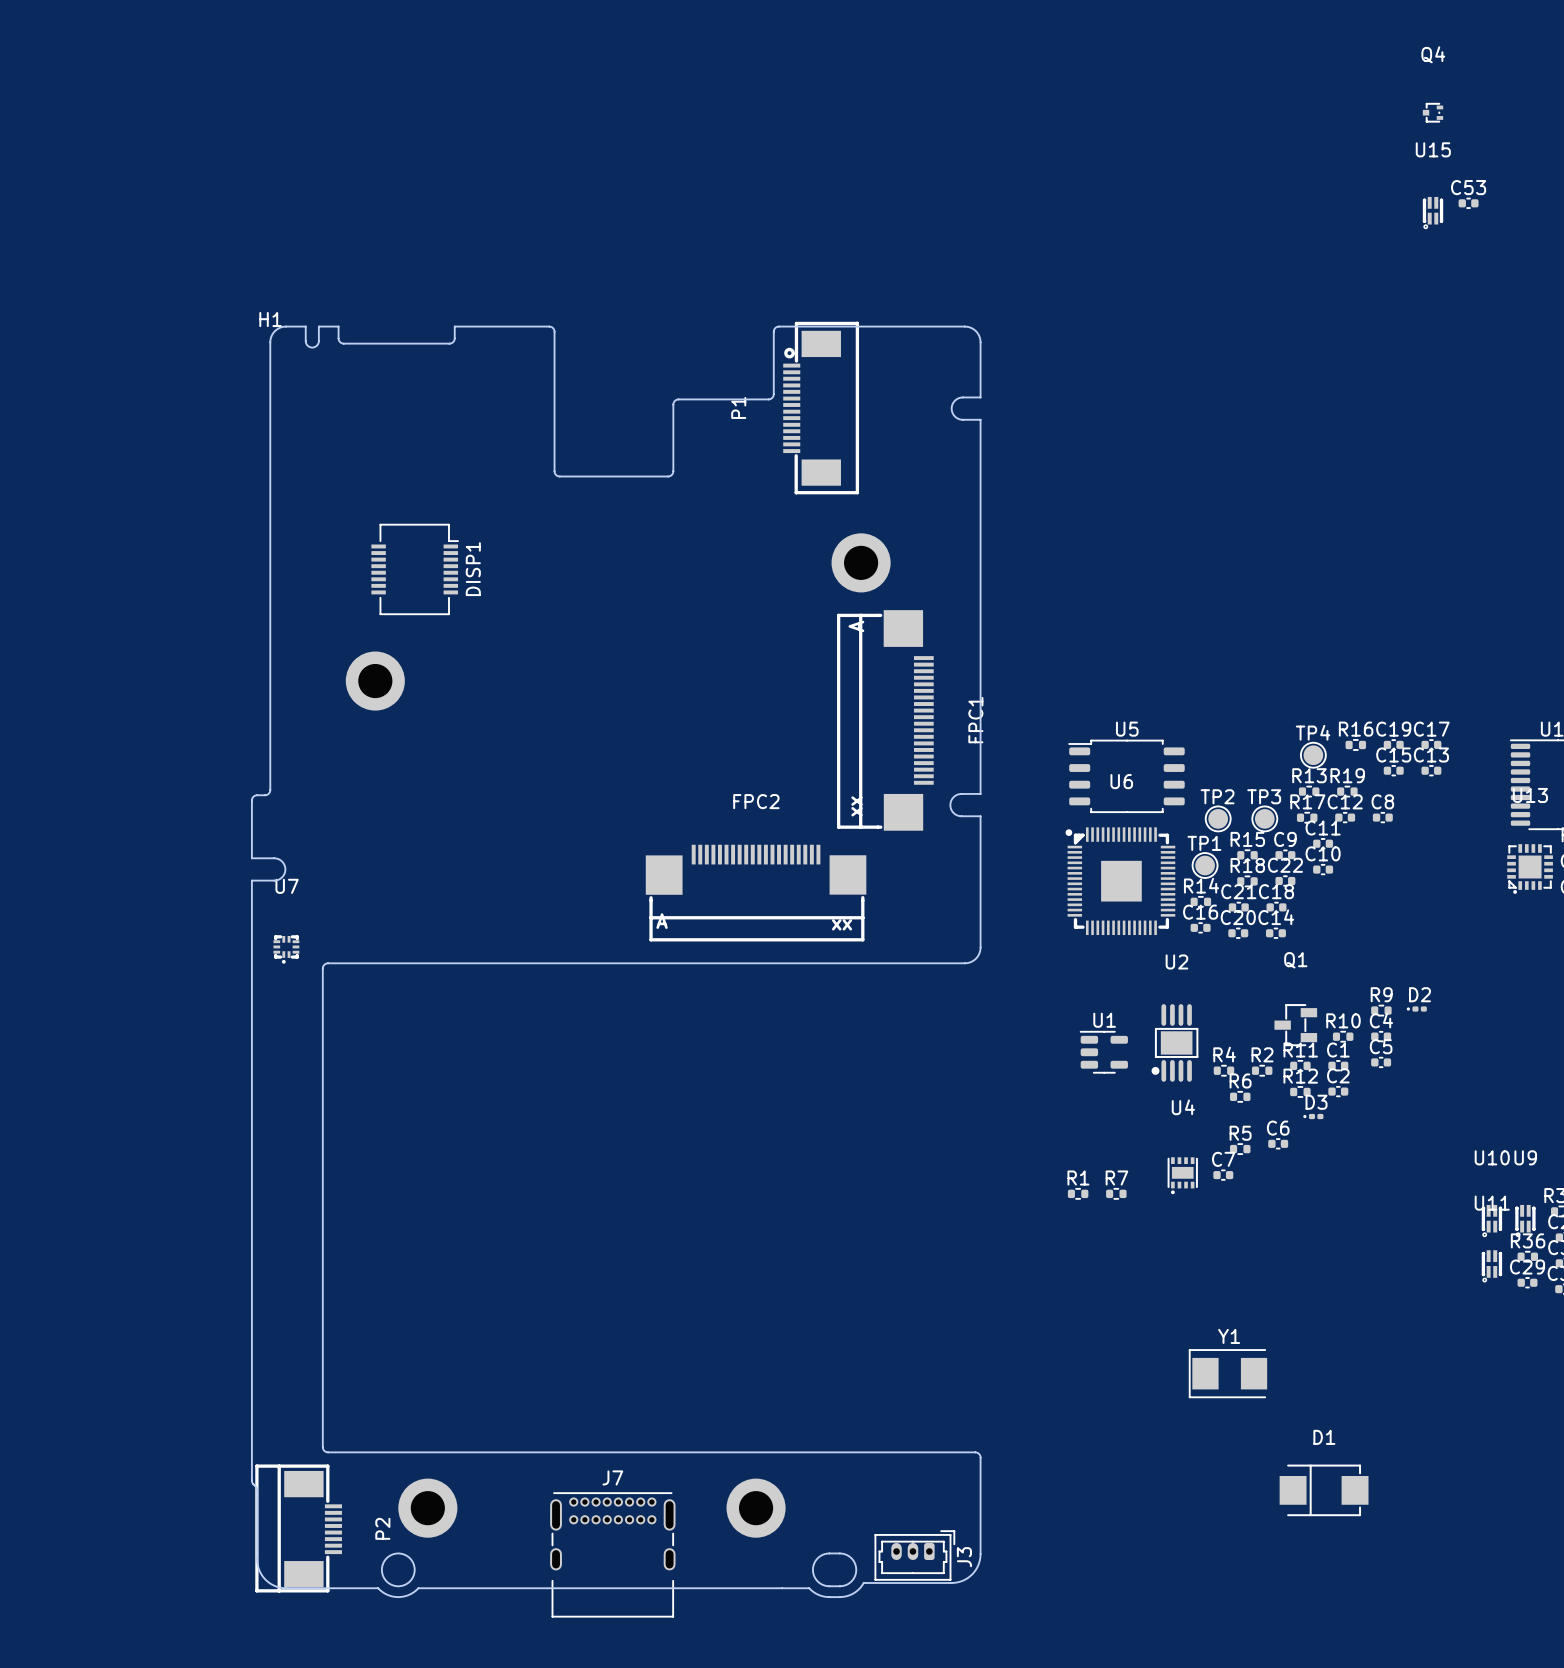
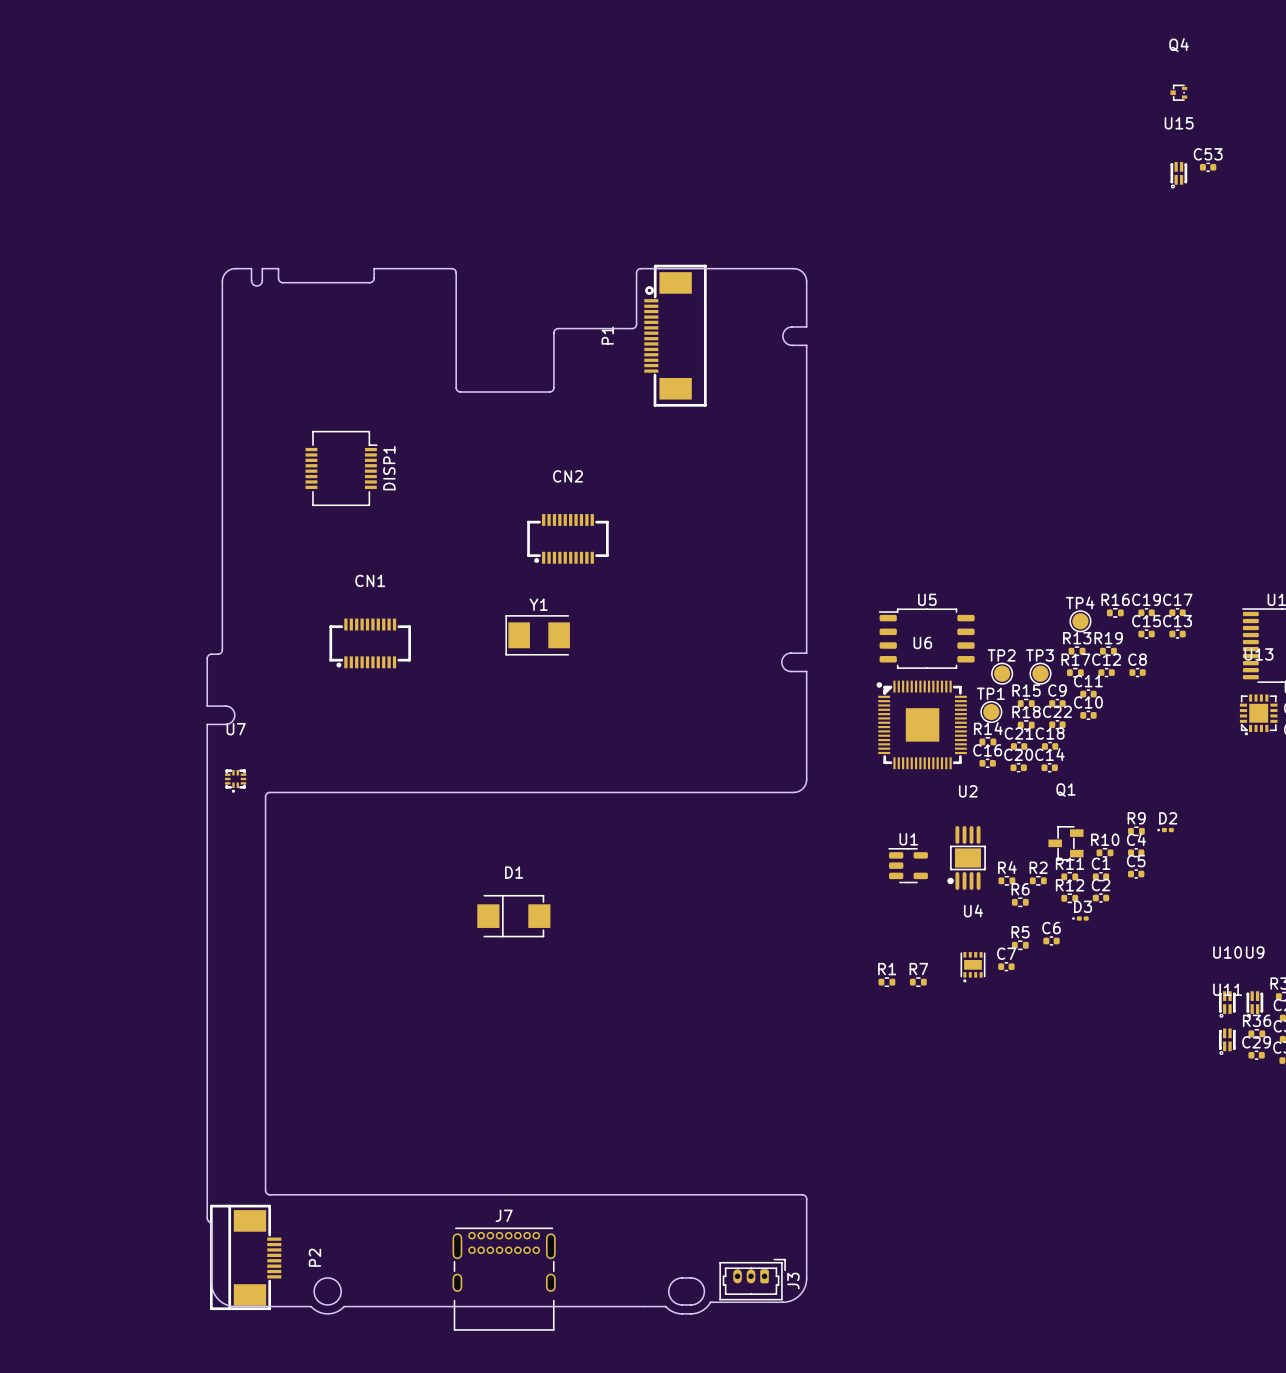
CN2: none -> (567, 538)
FPC1: (885, 720) -> none
CN1: none -> (370, 643)
FPC2: (756, 893) -> none
H1: (618, 1035) -> none
Y1 position: (1228, 1373) -> (537, 635)
D1 position: (1324, 1490) -> (513, 916)

